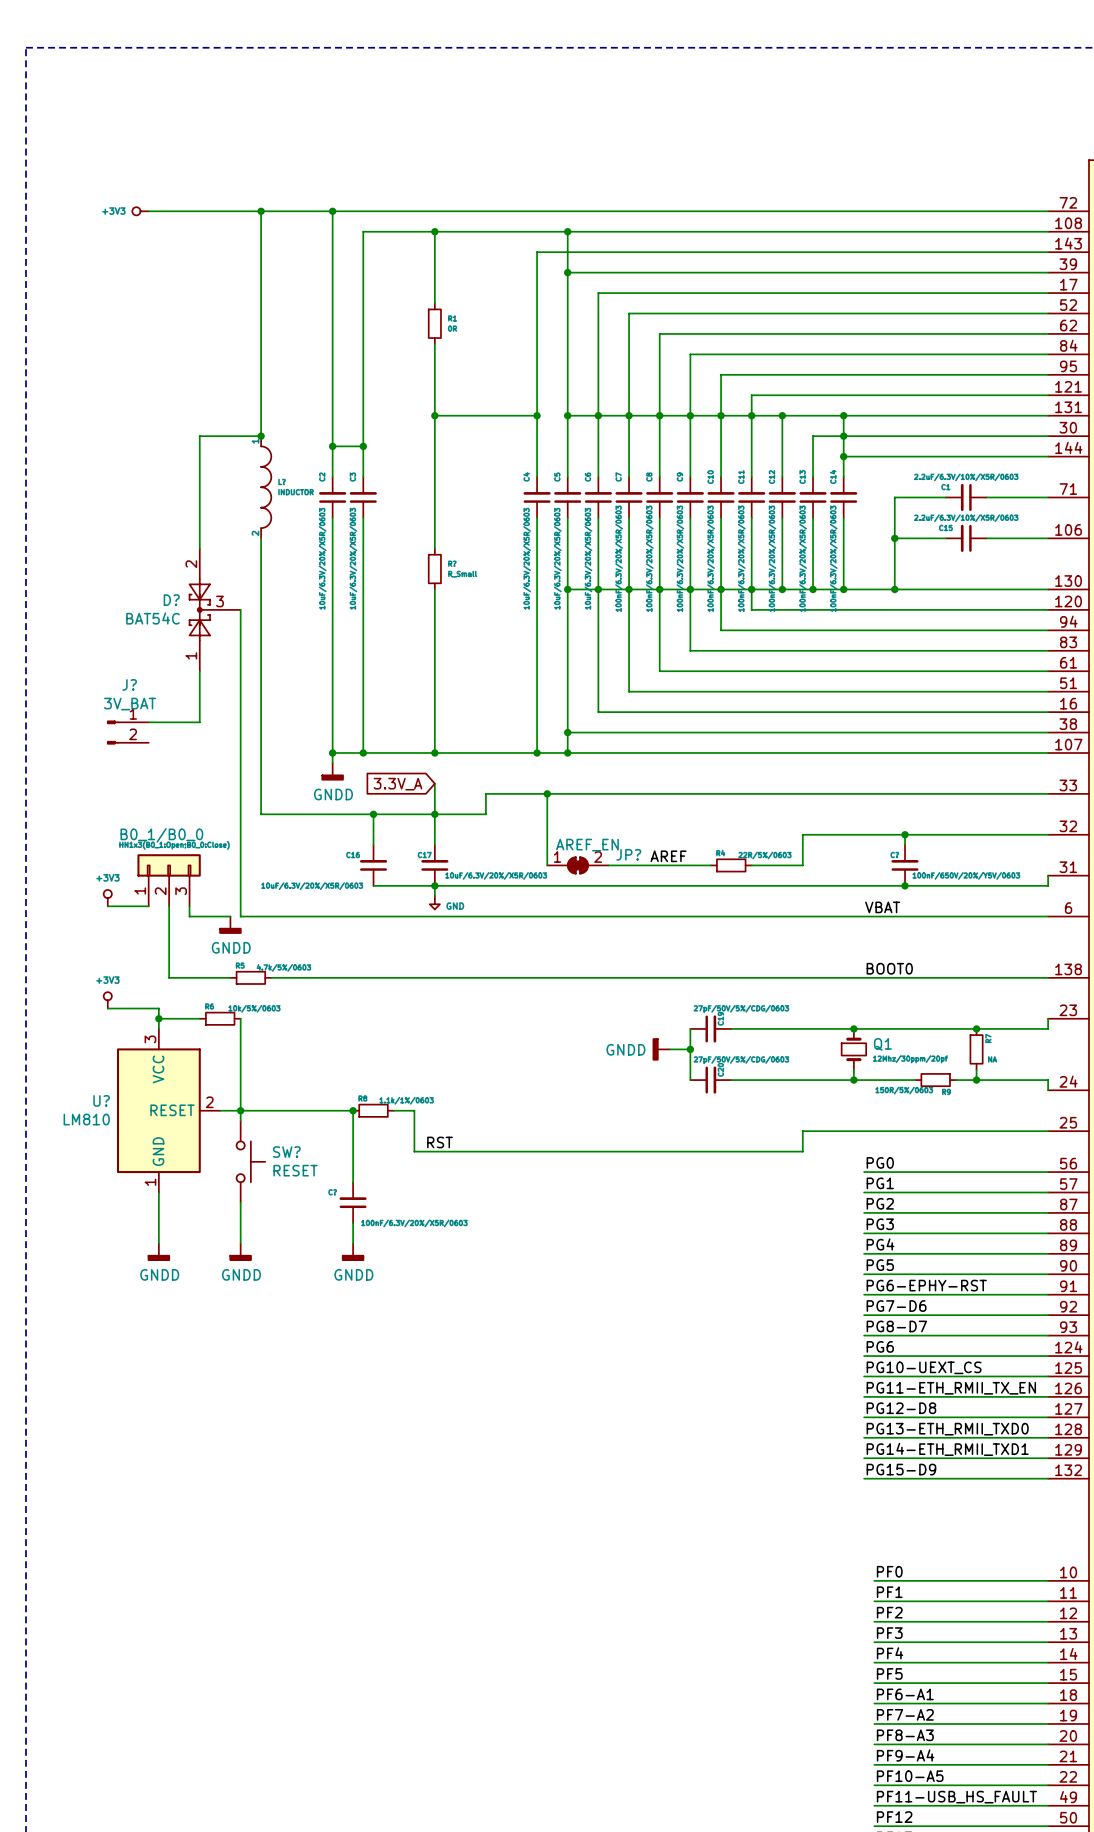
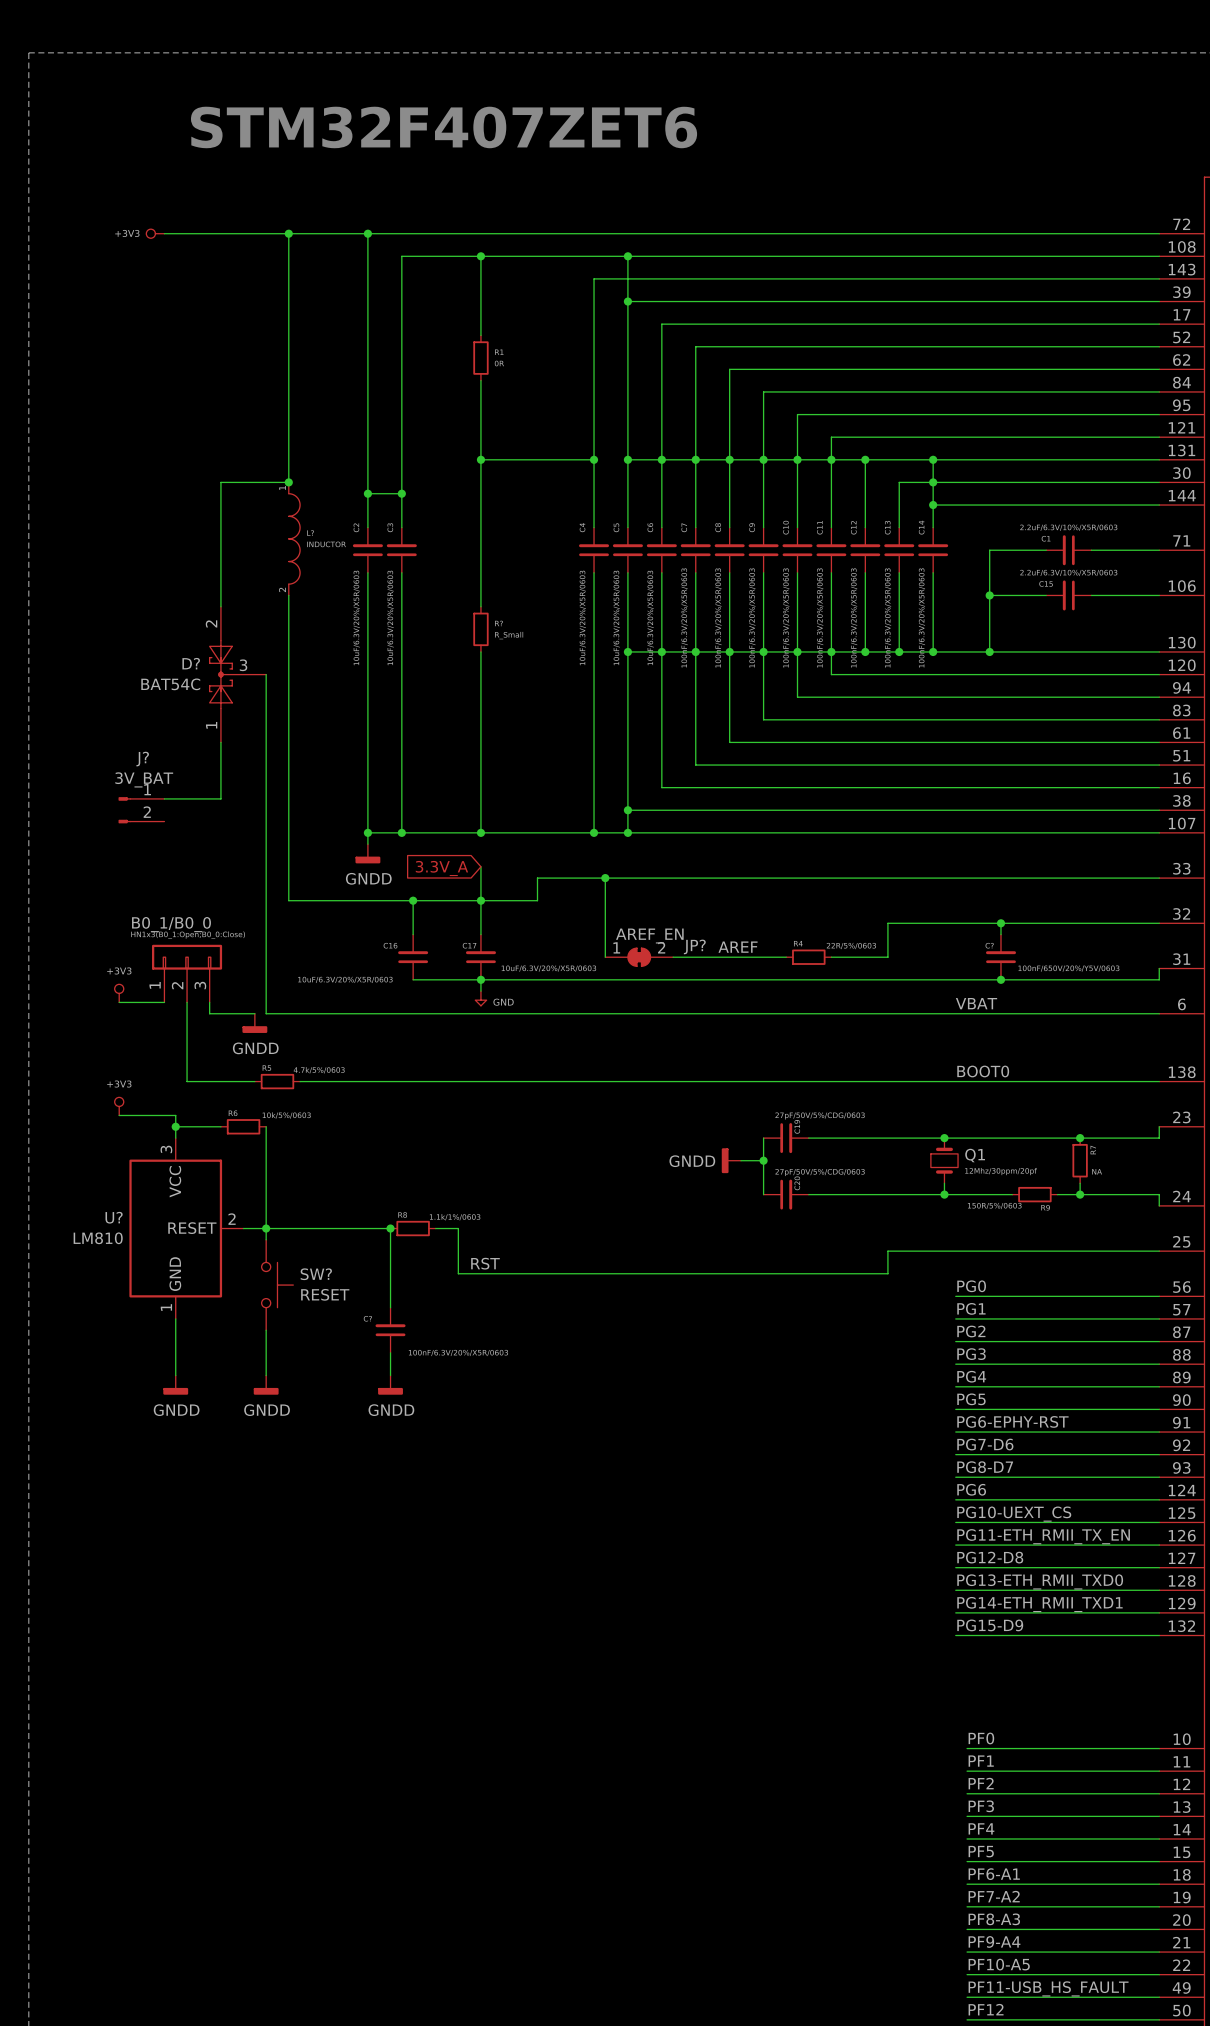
text: none -> STM32F407ZET6 (444, 127)

